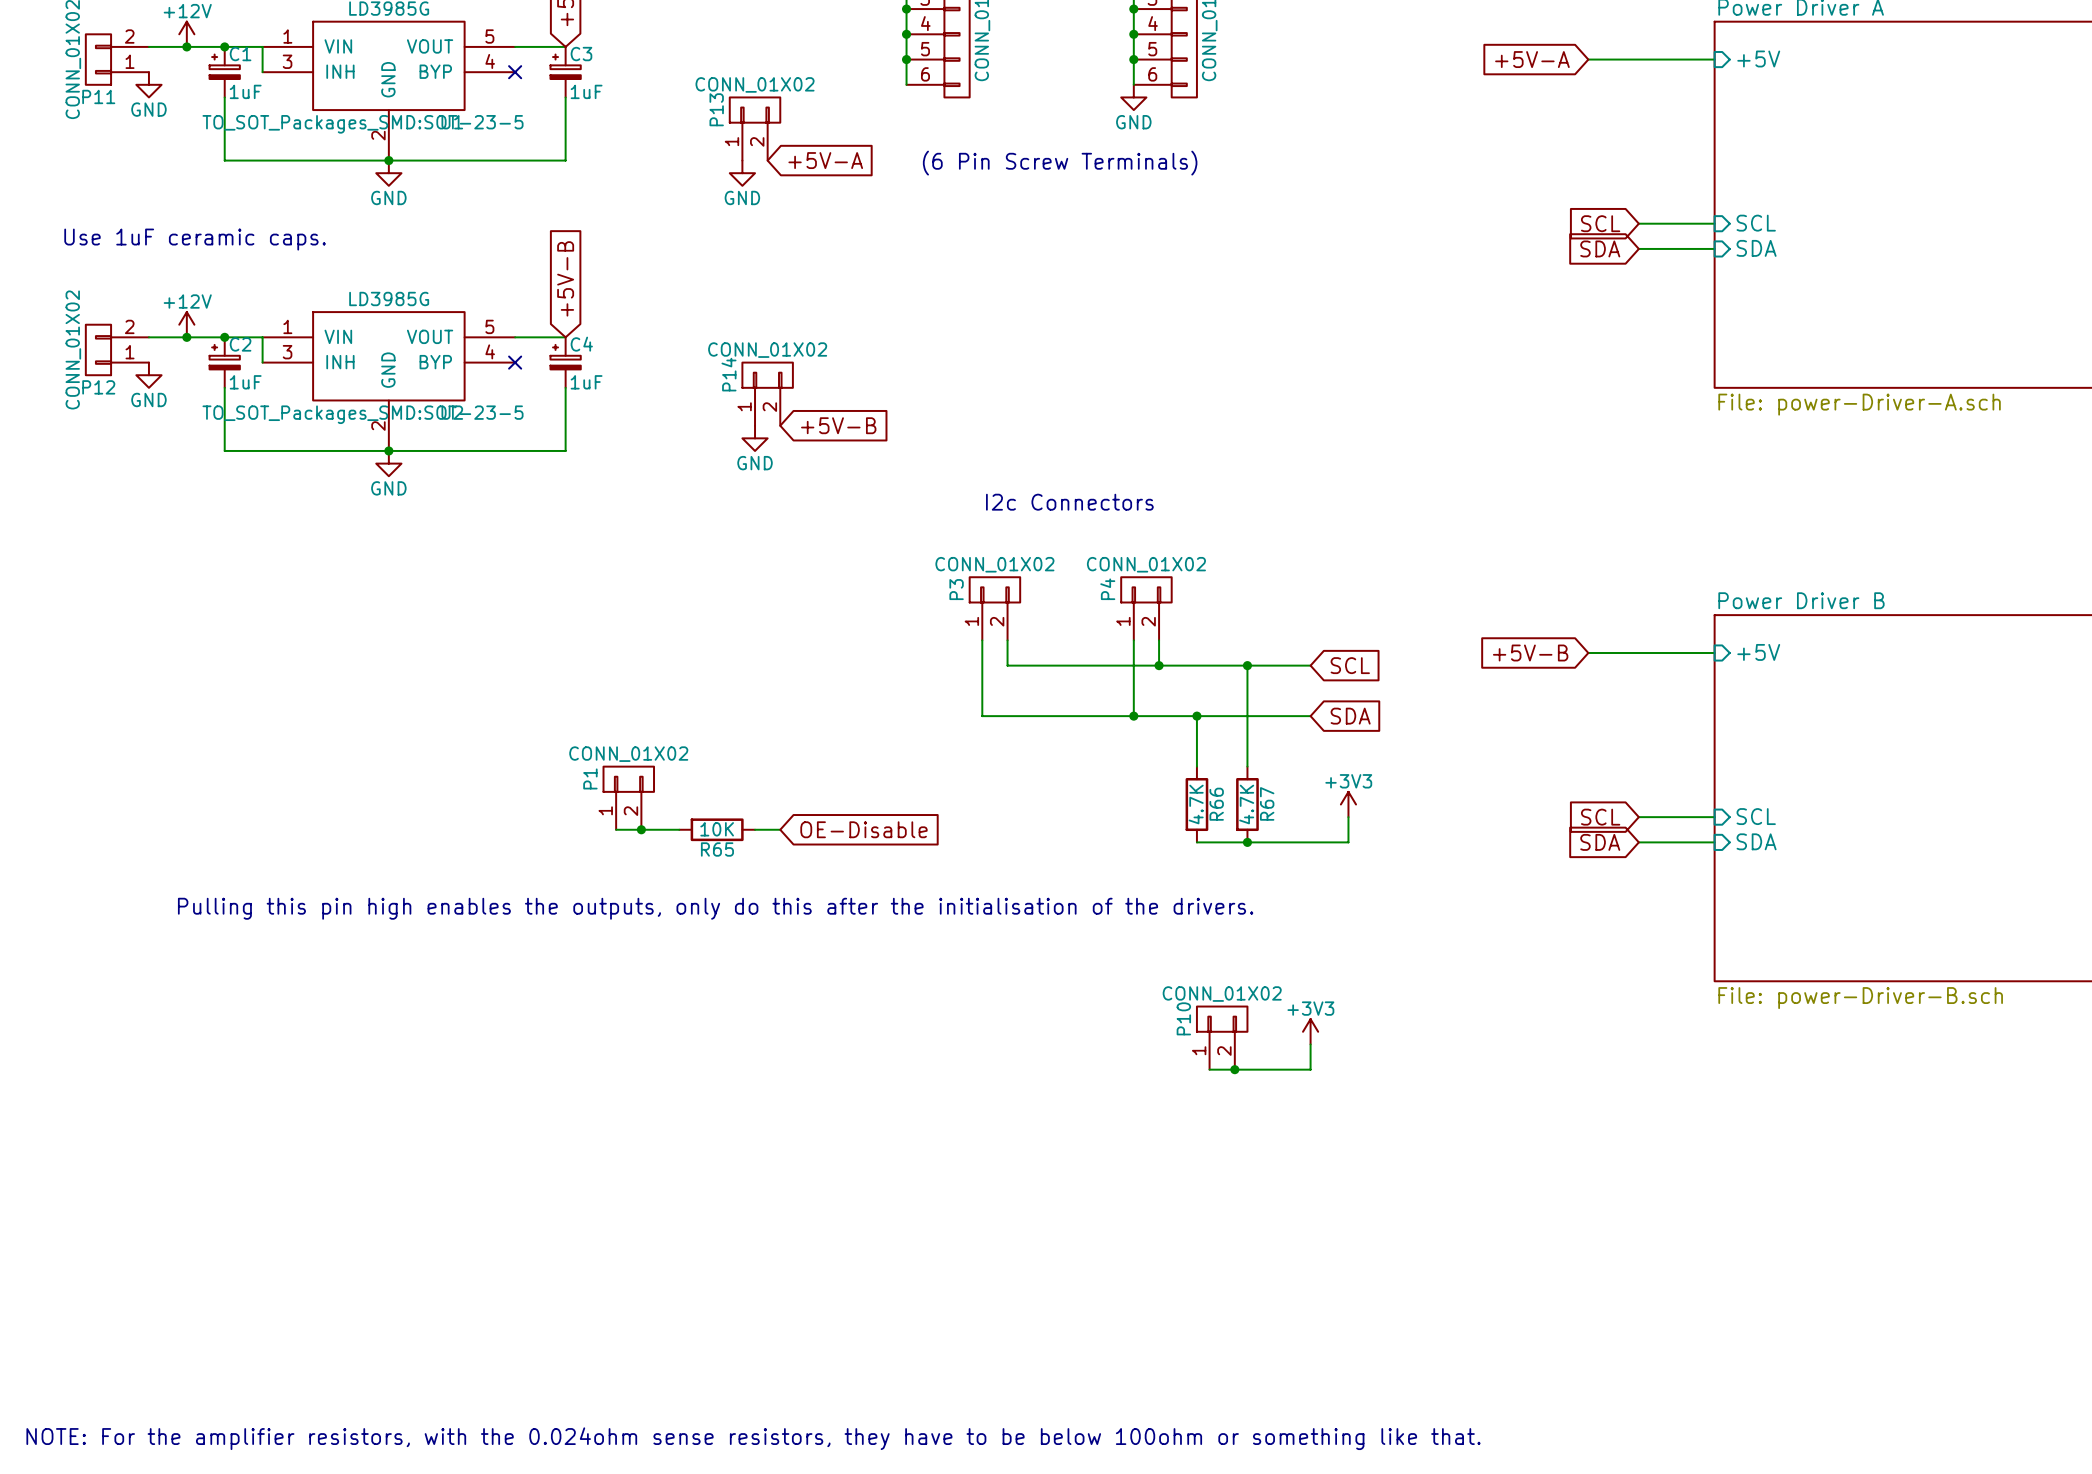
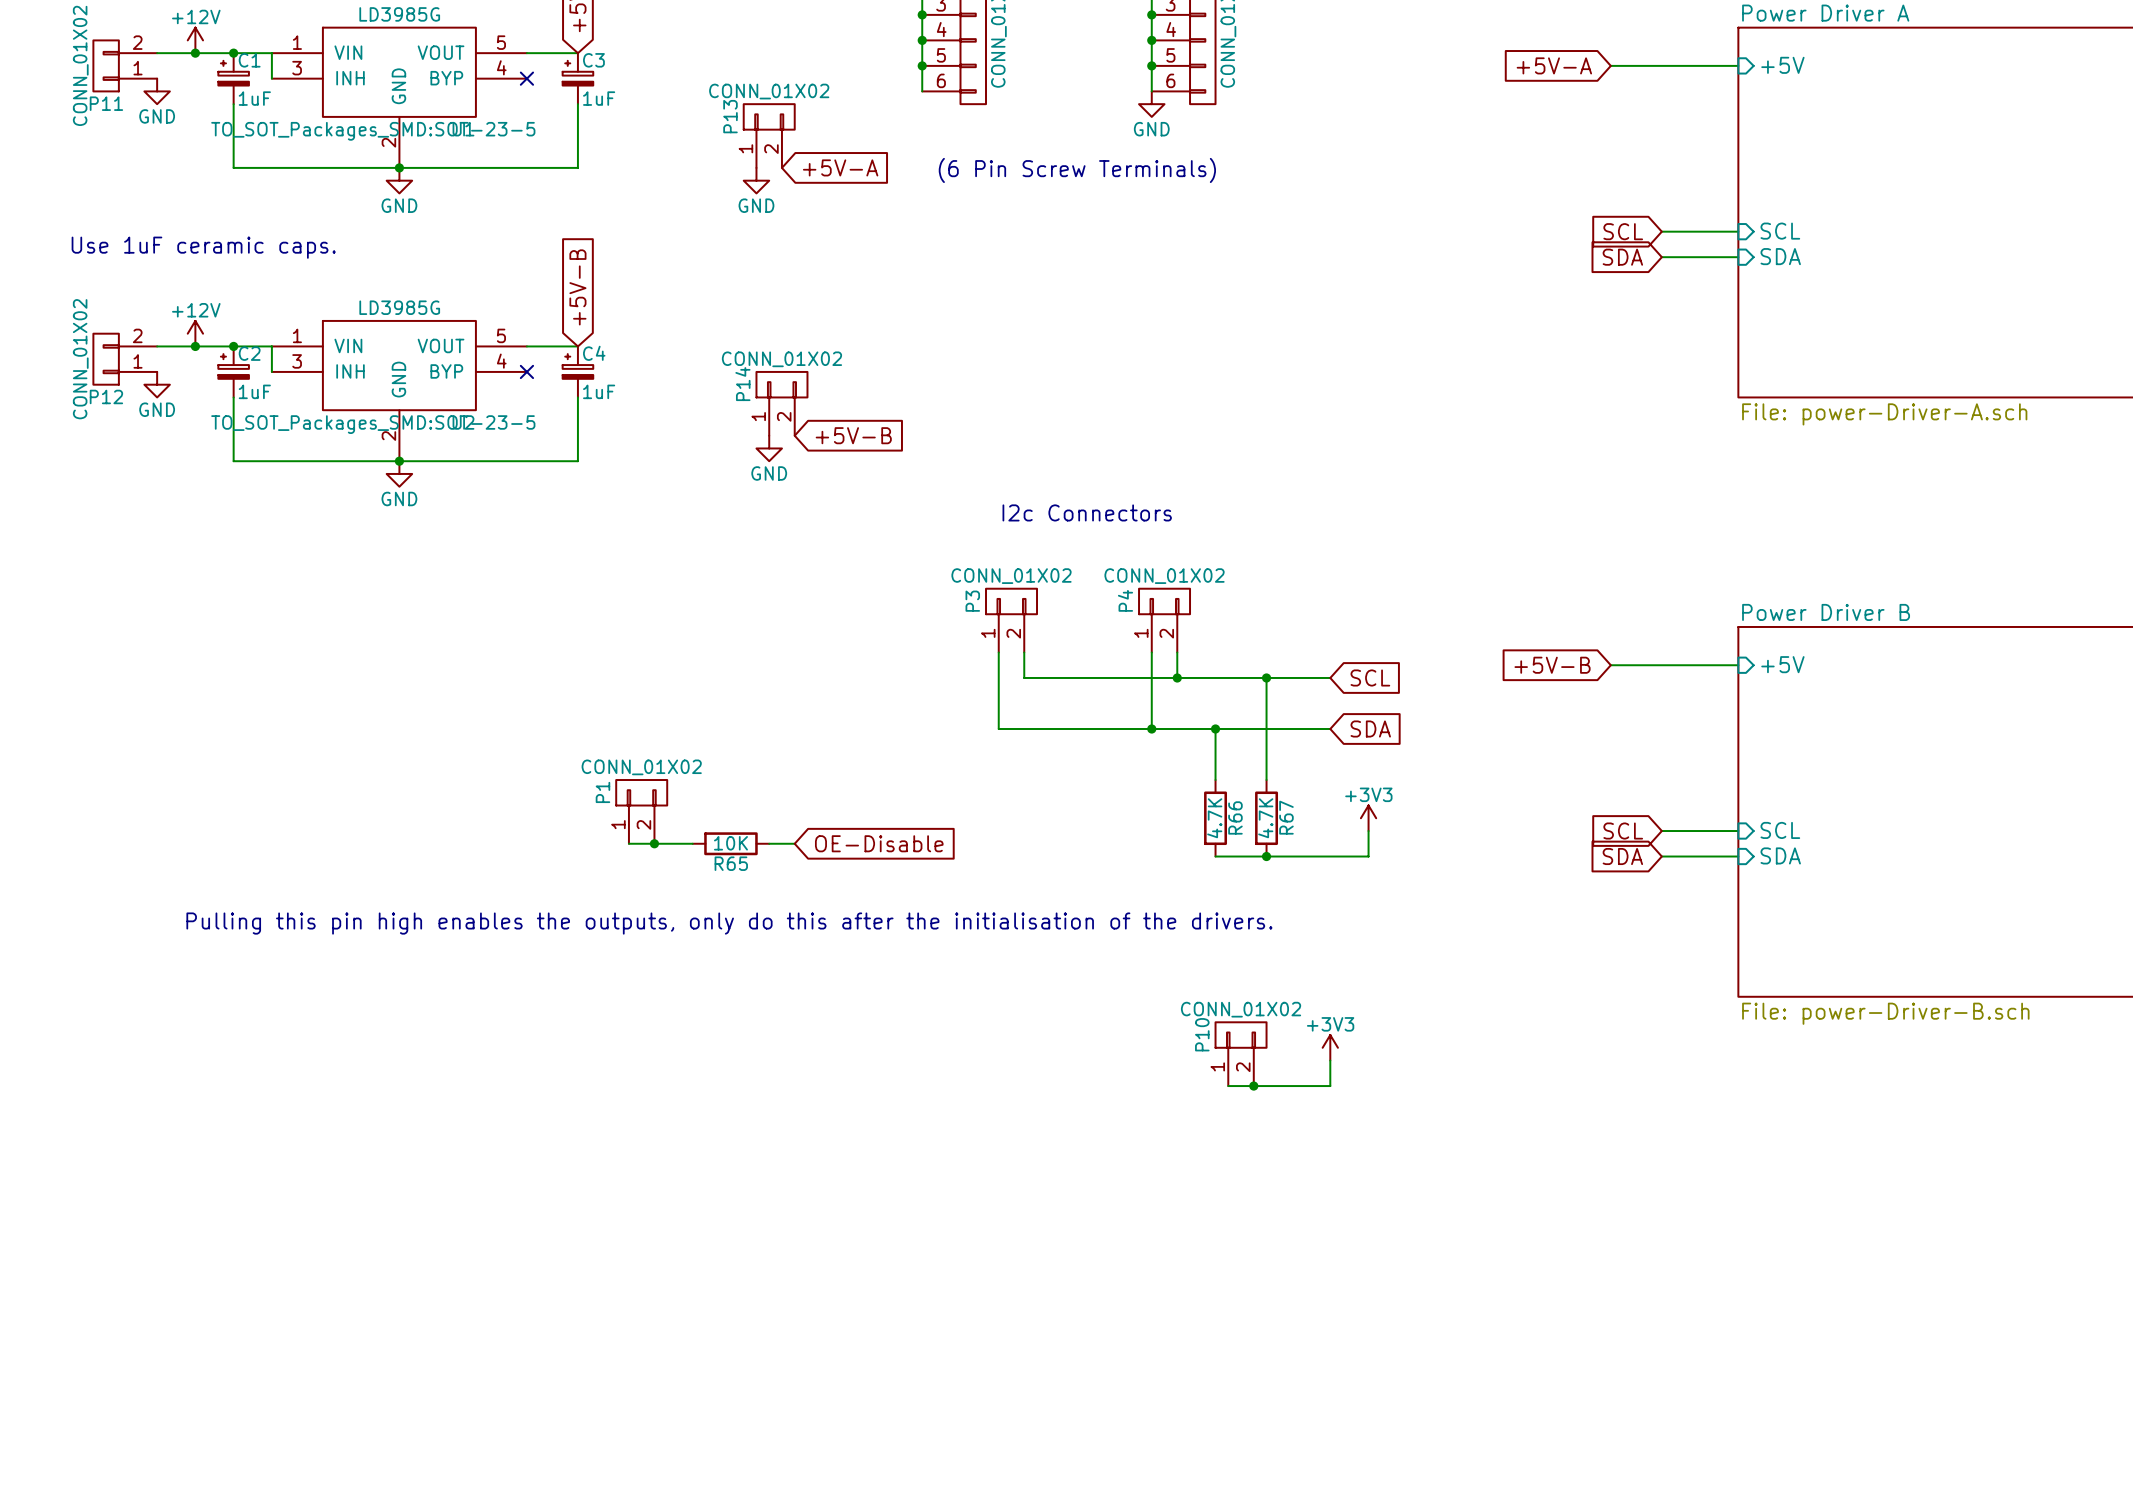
text: NOTE: For the amplifier resistors, with the 0.024ohm sense resistors, they have to be below 100ohm or something like that. (753, 1438) -> none

